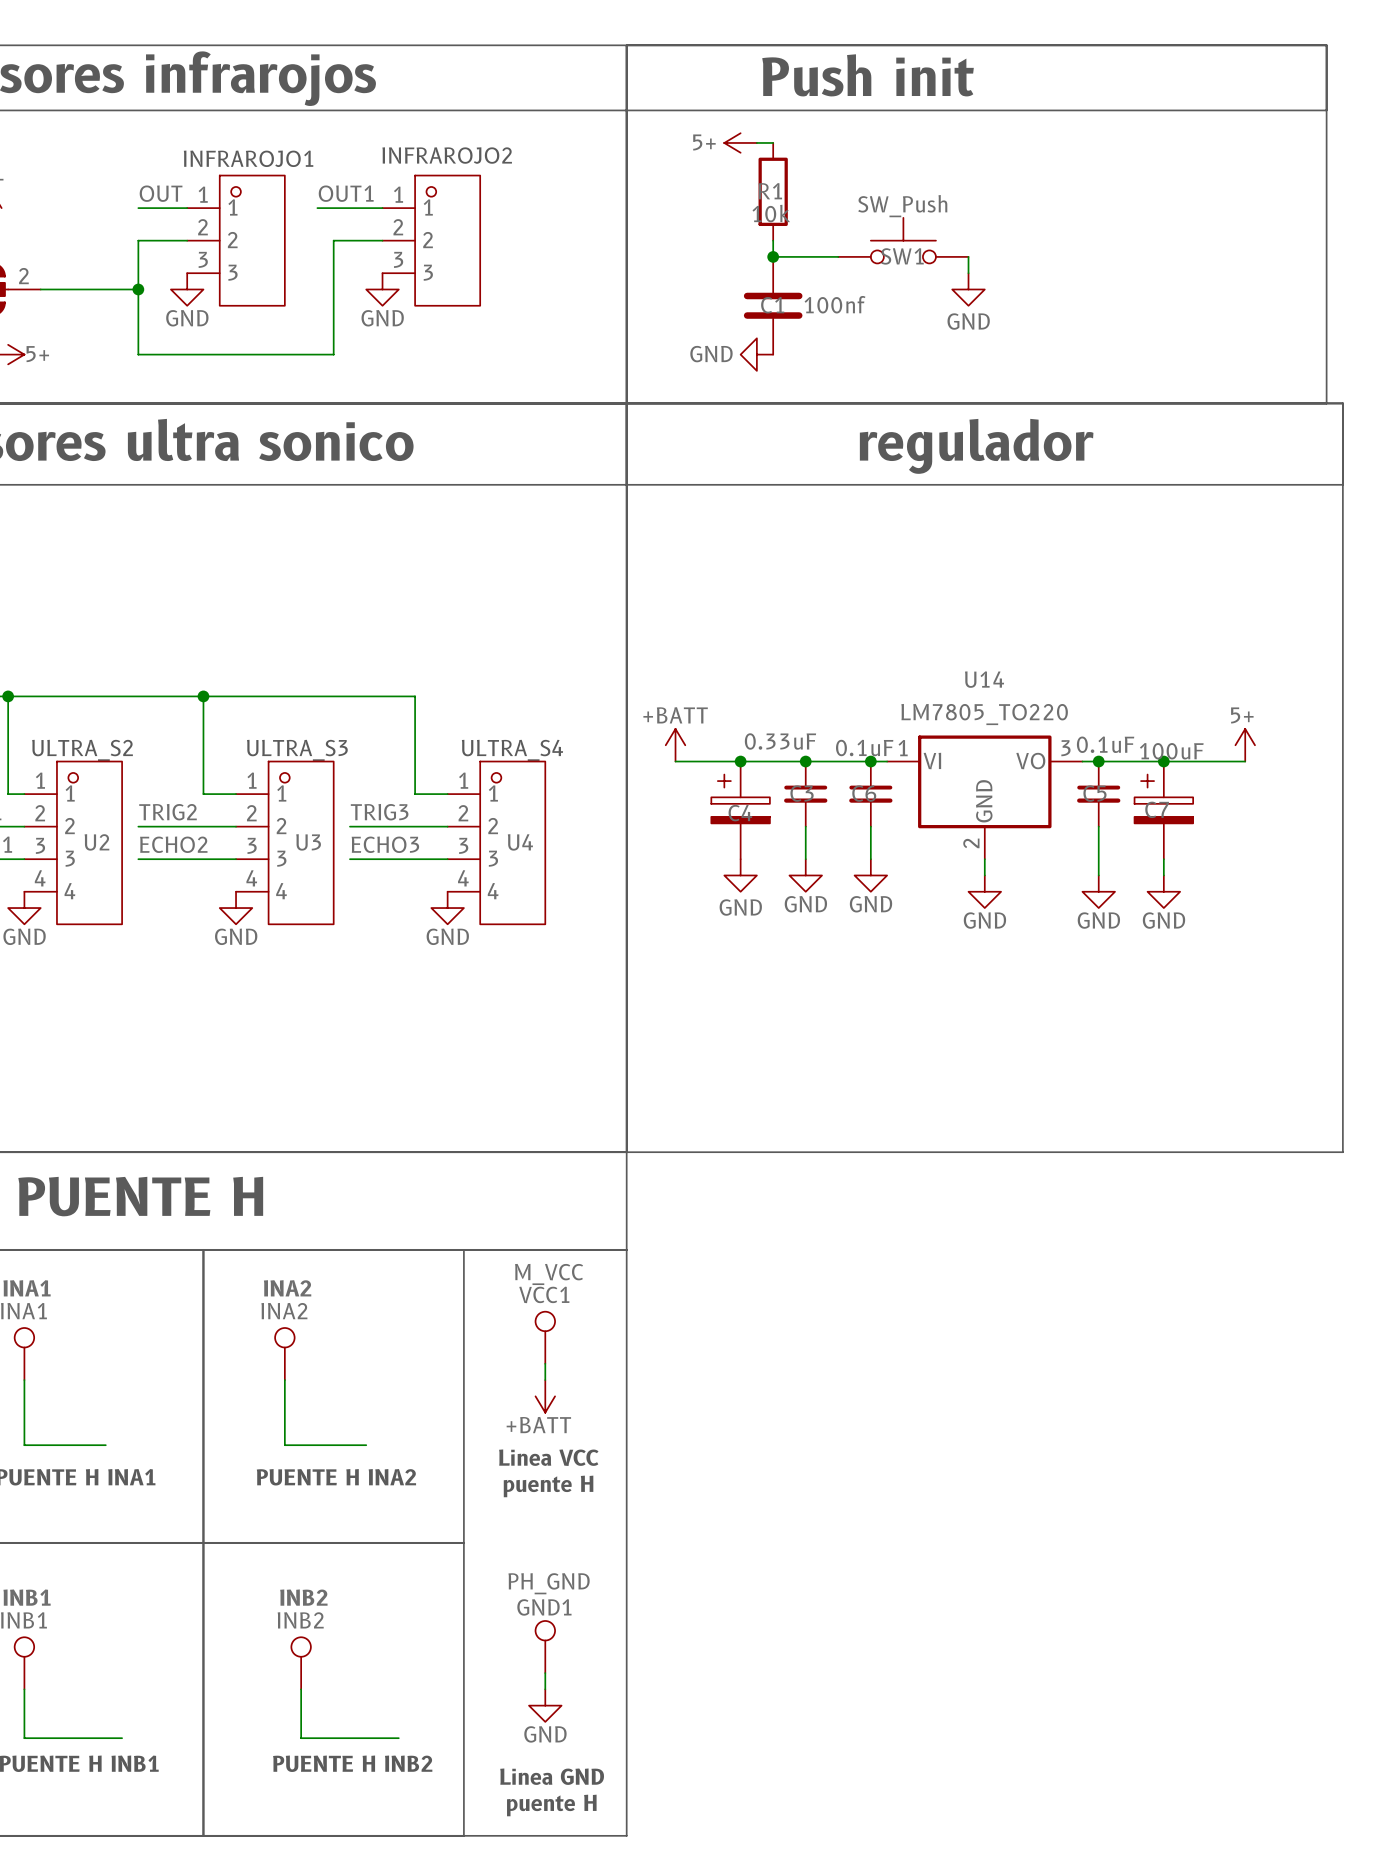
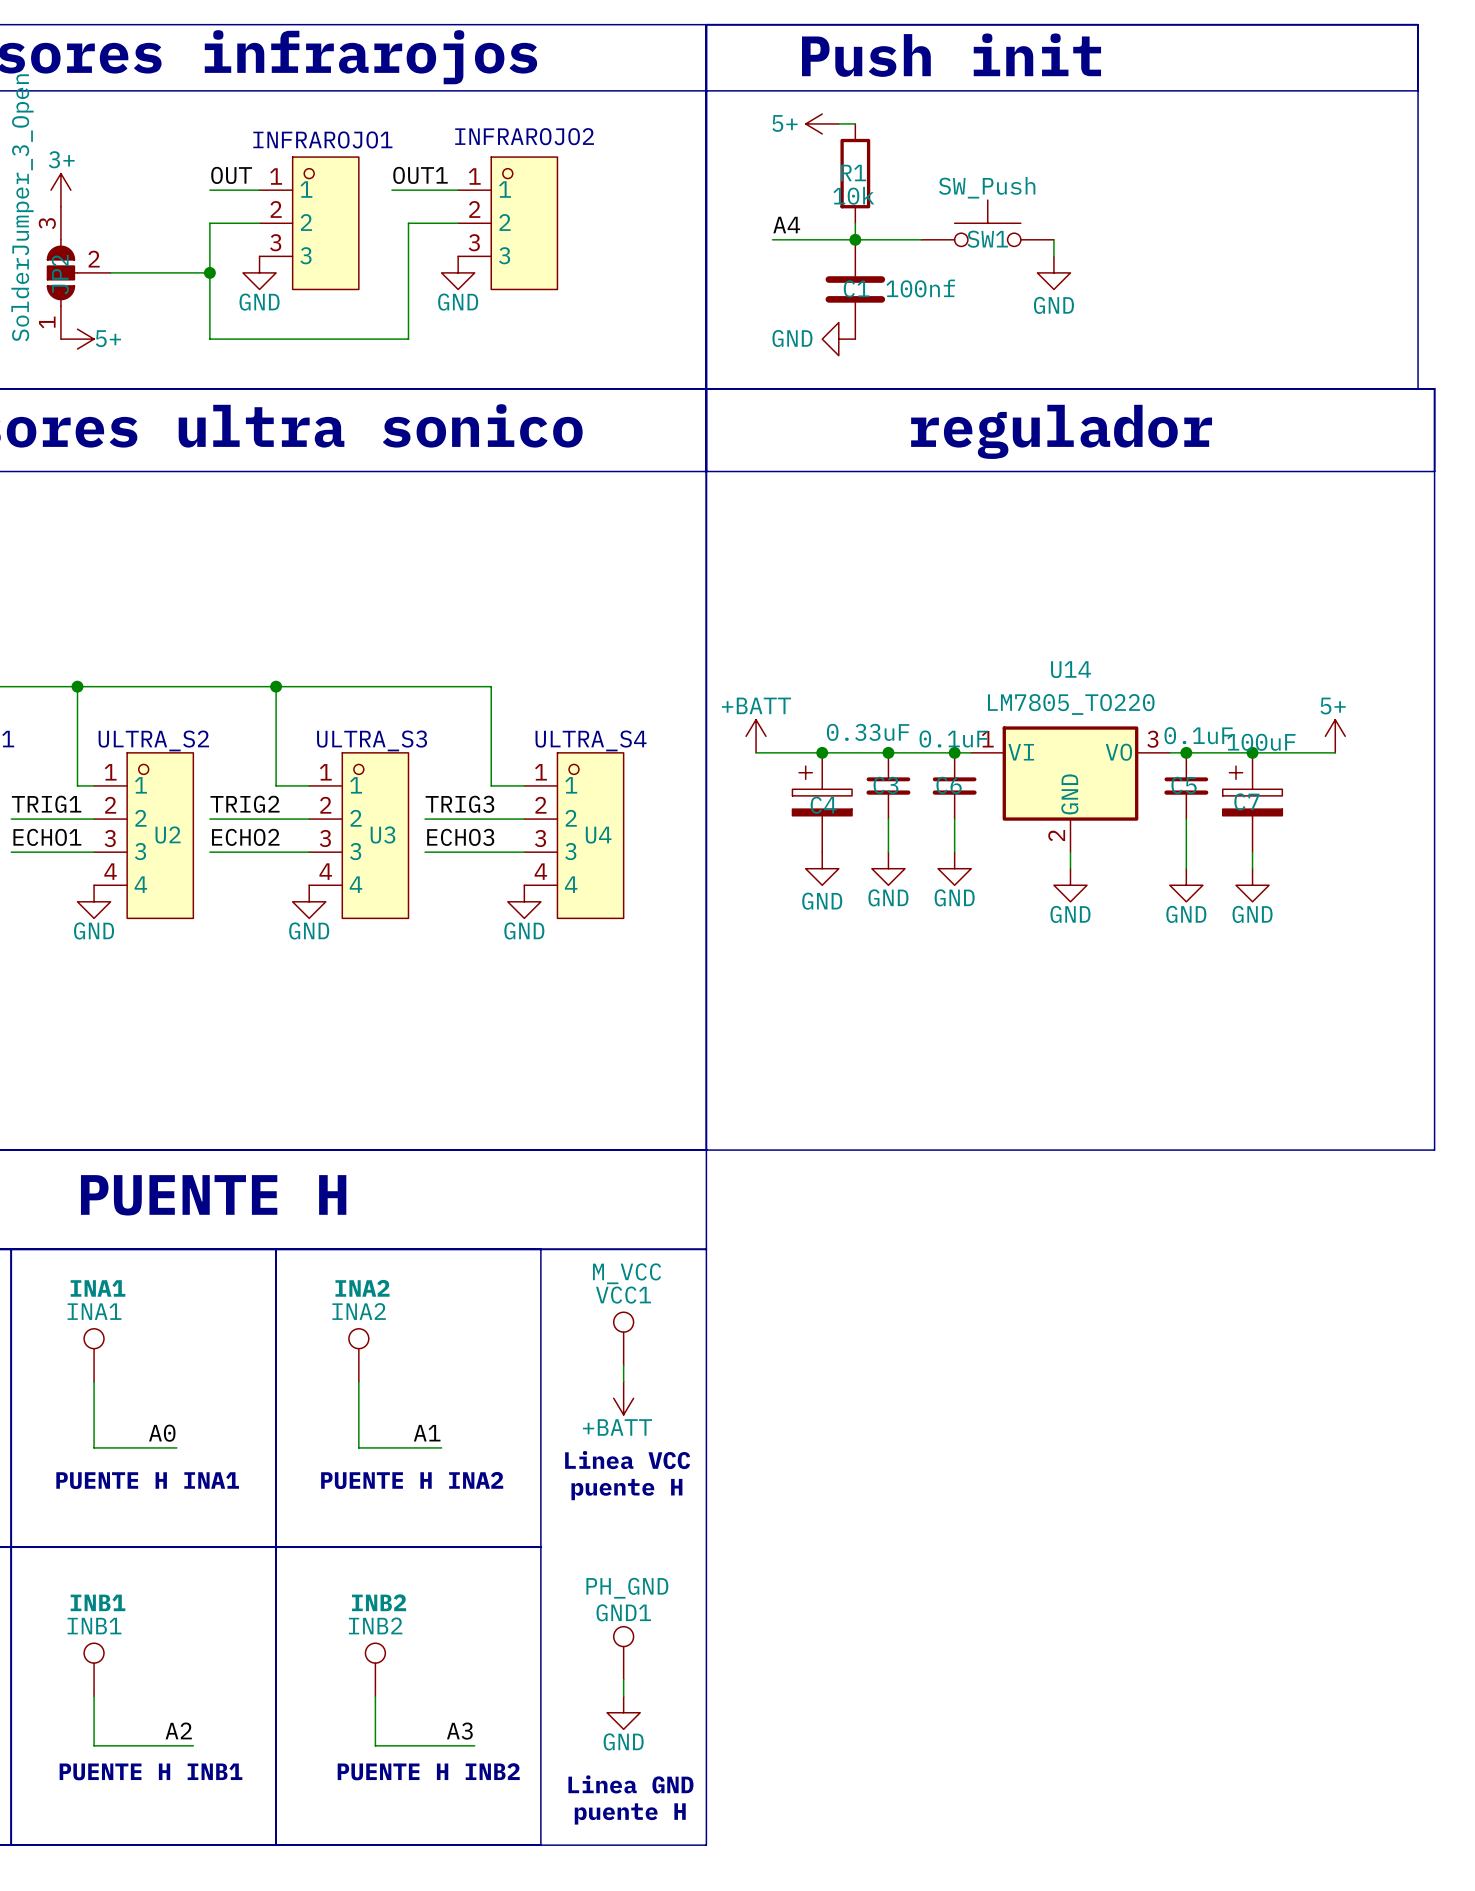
label: none -> A4 (786, 225)
wire: none -> (772, 239) (855, 239)
label: none -> A0 (162, 1433)
label: none -> A1 (427, 1433)
label: none -> A2 (178, 1730)
label: none -> A3 (459, 1731)

